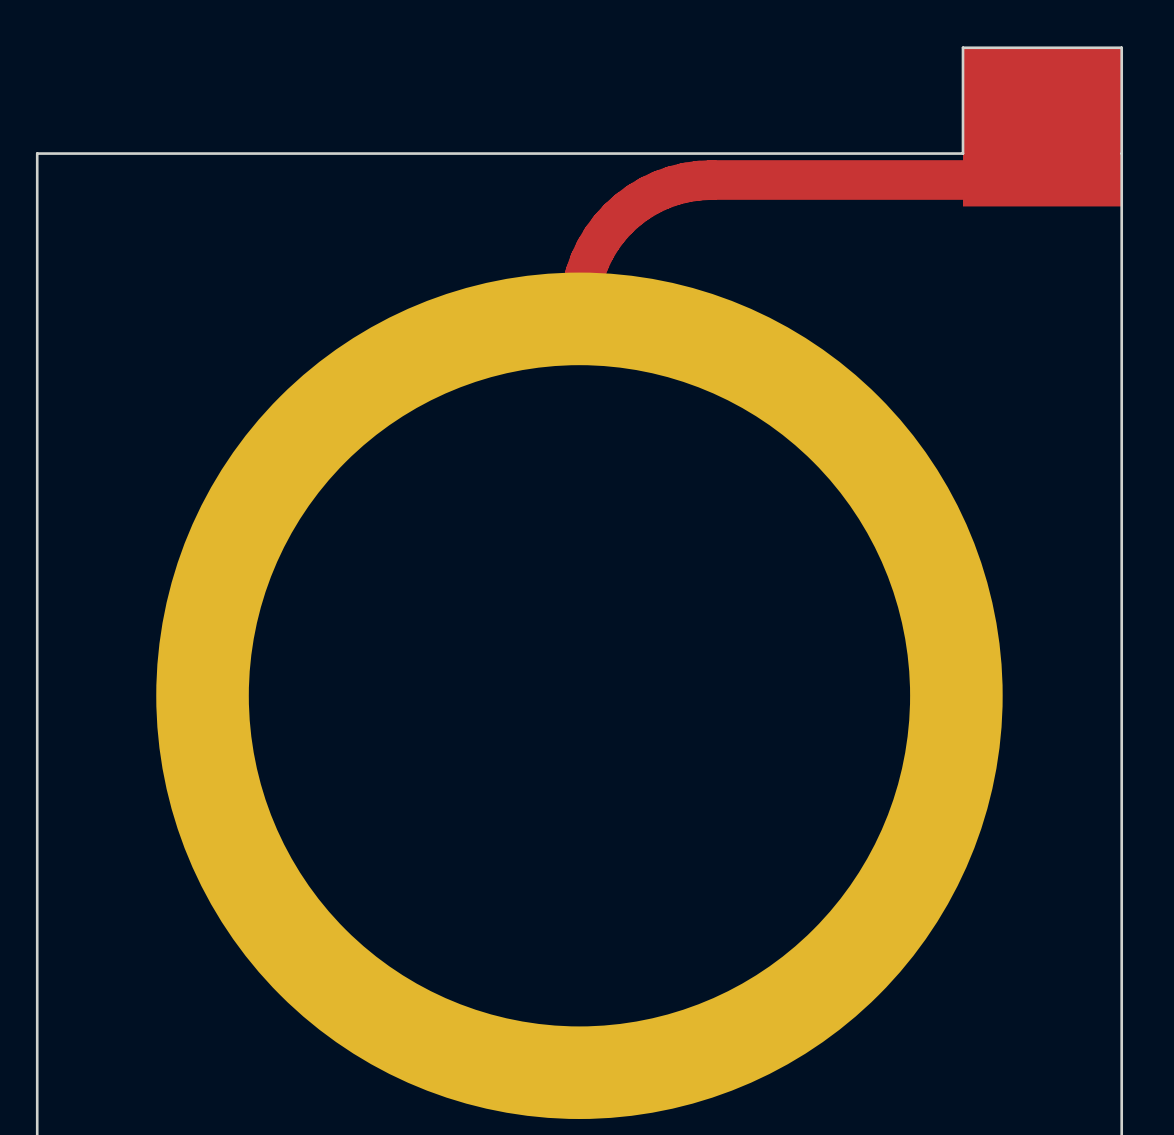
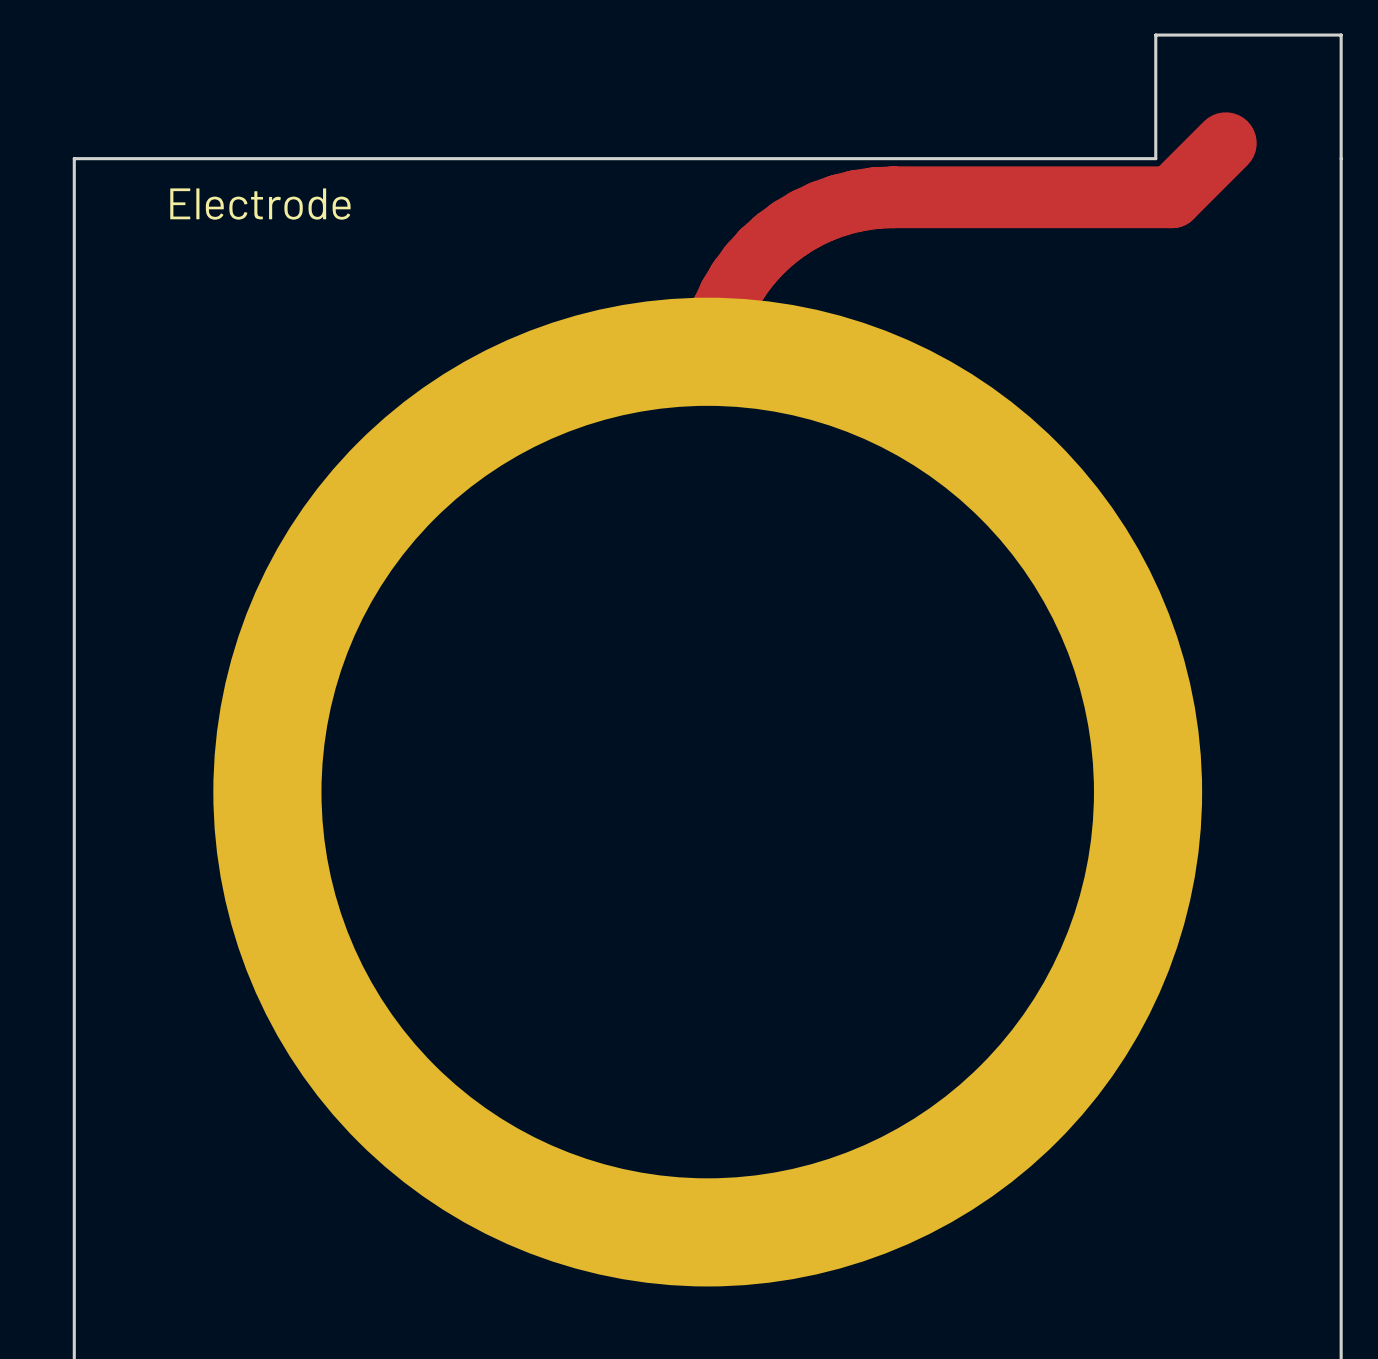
track: (1042, 127) (989, 180) (711, 180) (685, 182) (661, 190) (627, 210) (601, 238) (585, 273) (579, 312) -> none
part: (1042, 127) -> none
track: none -> (1225, 143) (1171, 197) (893, 197) (856, 200) (839, 205) (805, 219) (775, 239) (749, 265) (738, 279) (721, 311) (715, 328) (708, 364) (707, 792)
text: none -> Electrode (260, 204)

